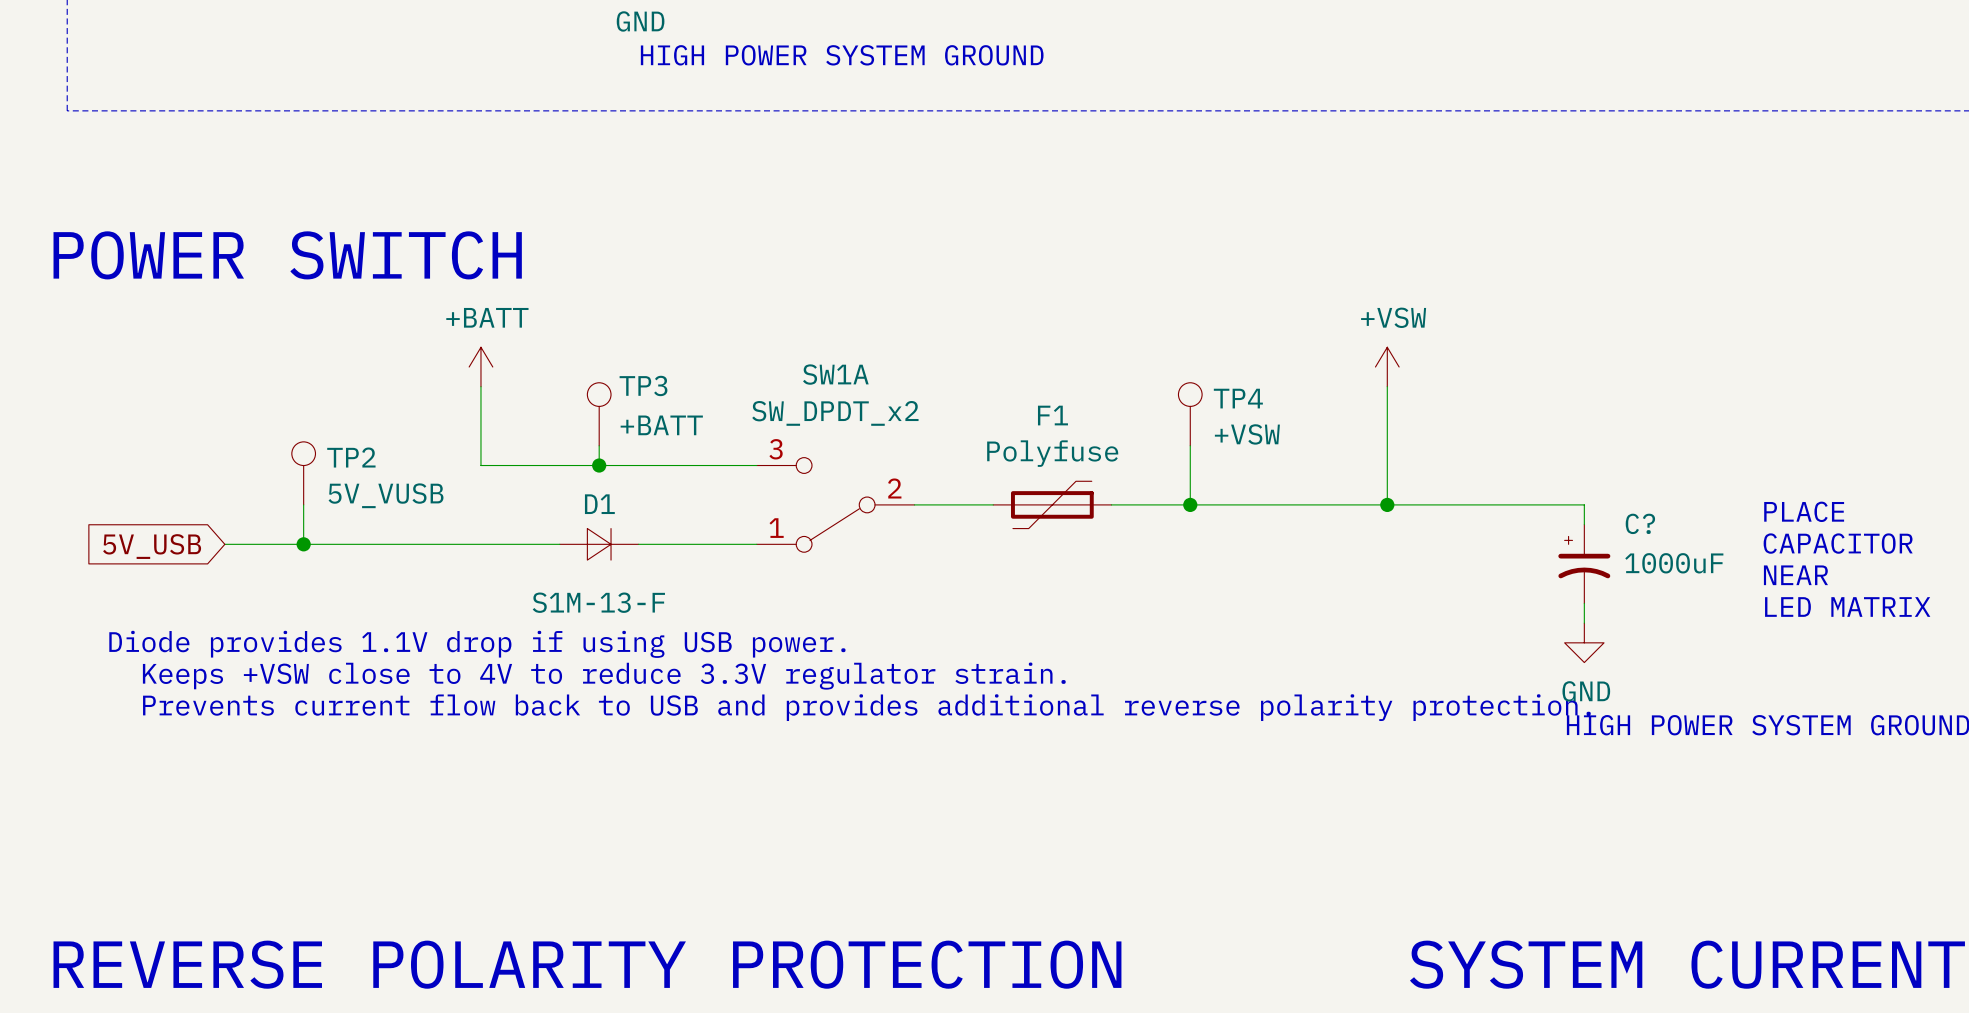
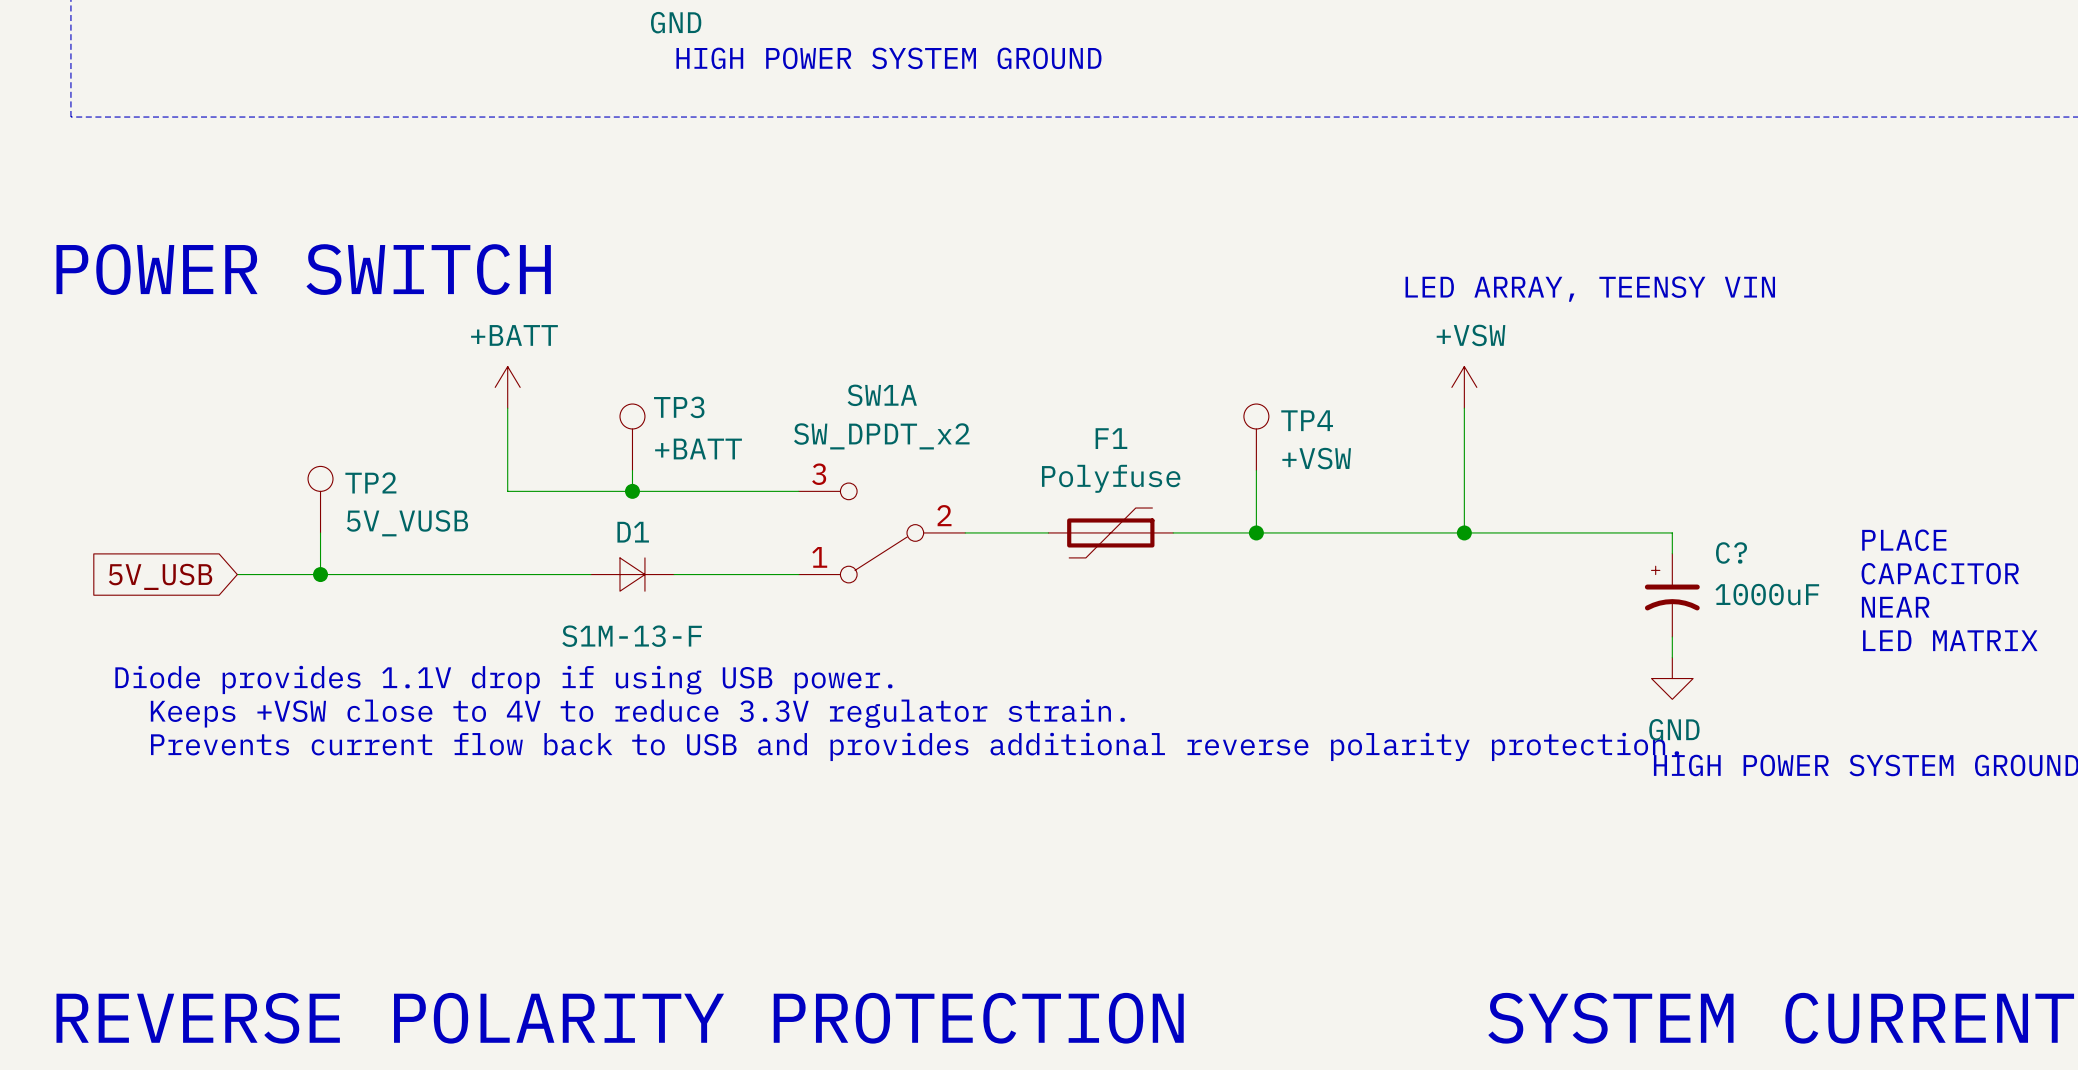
text: none -> LED ARRAY, TEENSY VIN (1590, 289)

